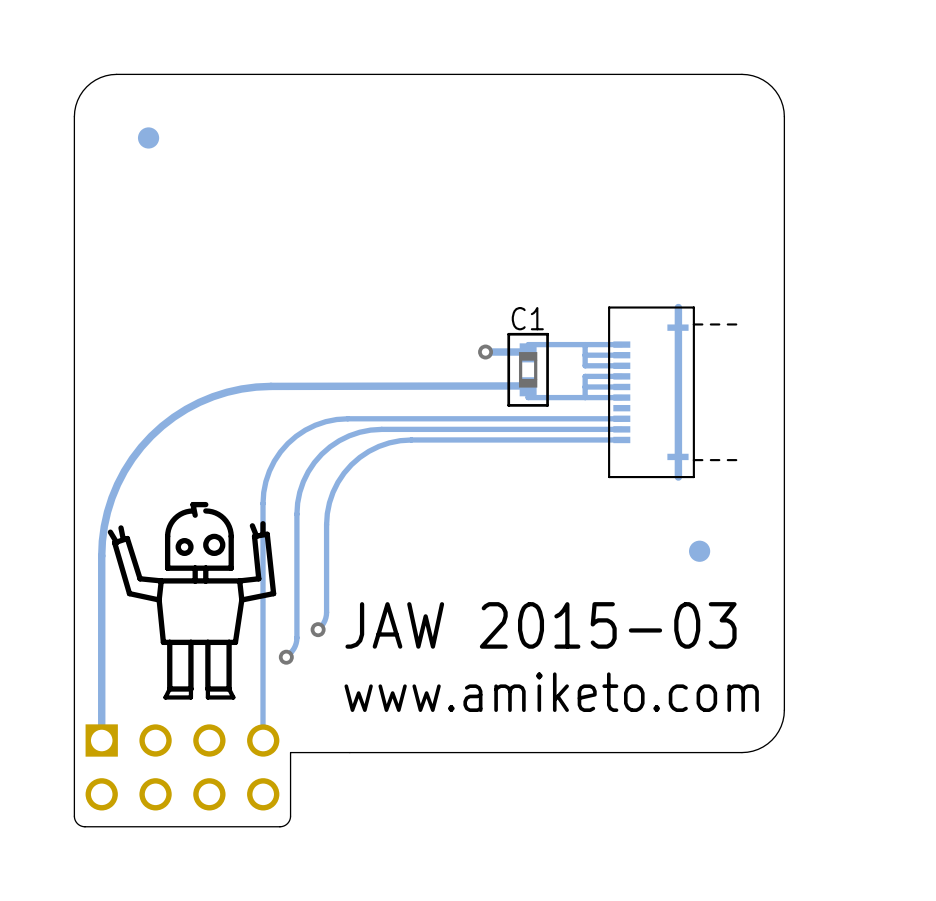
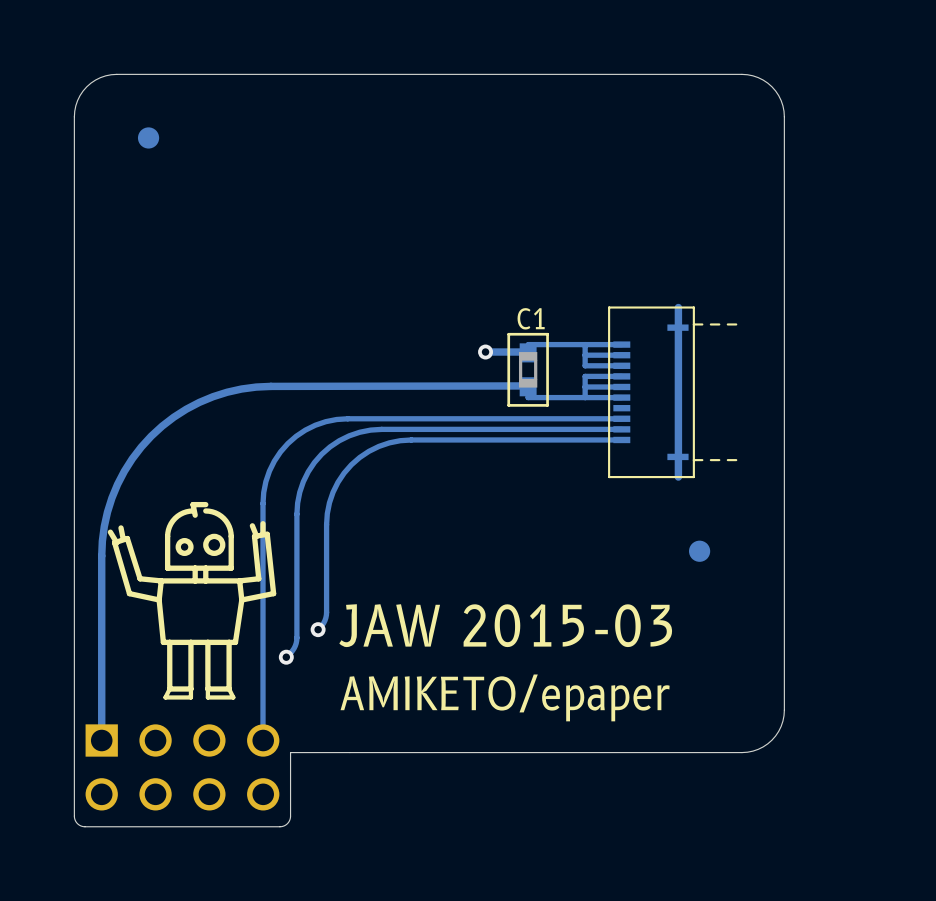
text: www.amiketo.com (551, 692) -> AMIKETO/epaper (505, 697)

